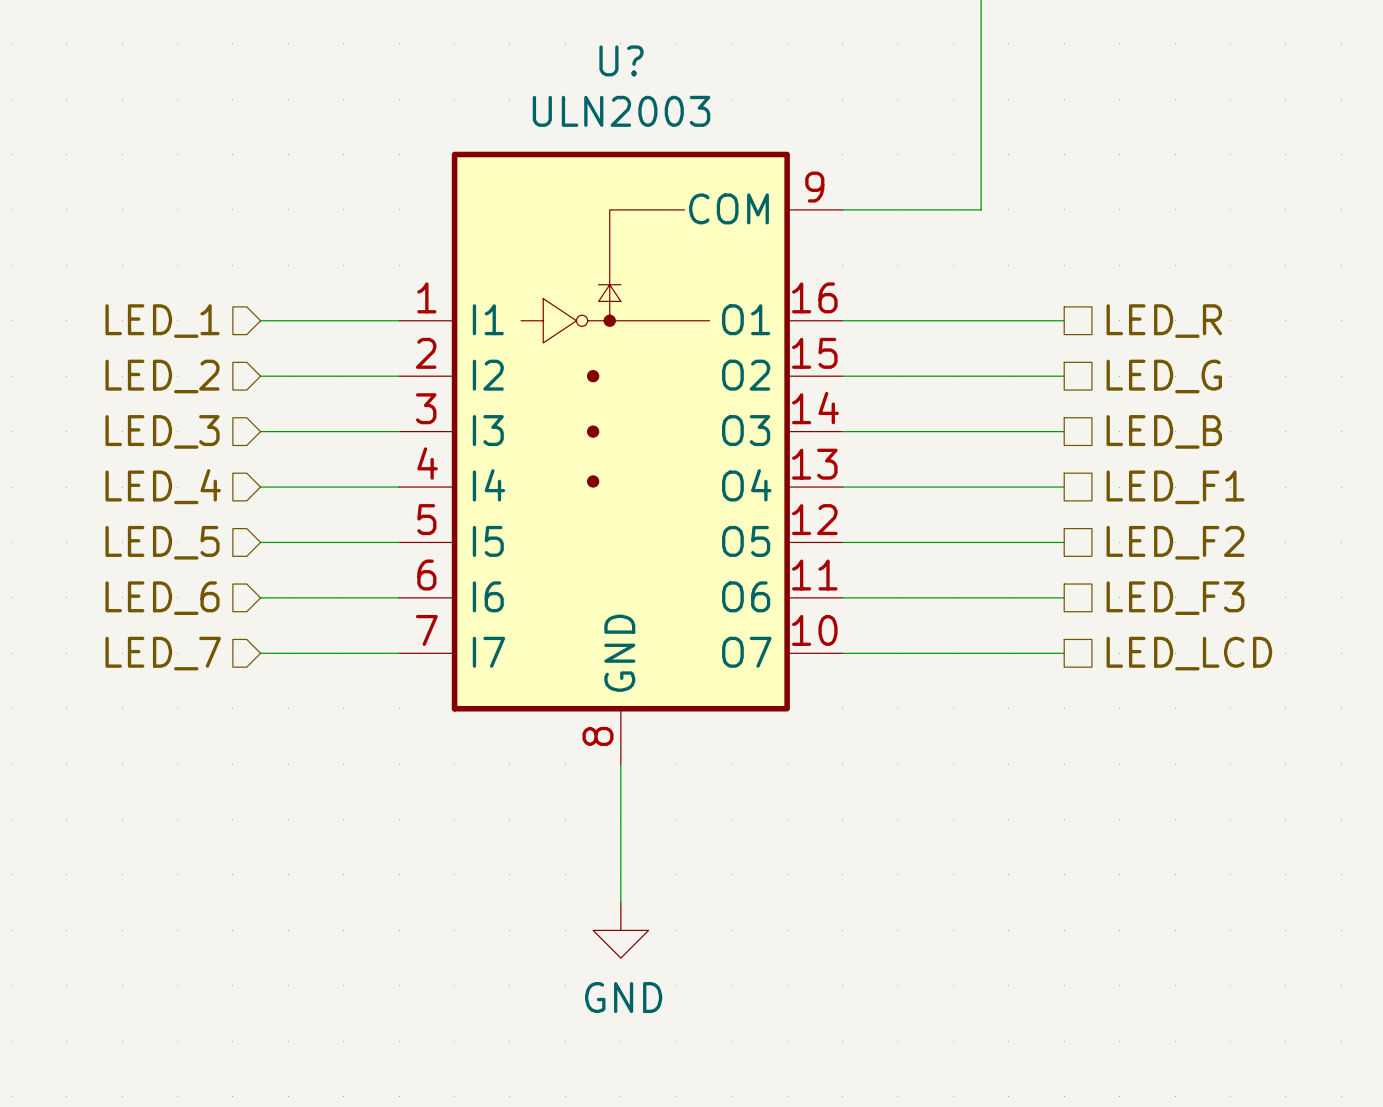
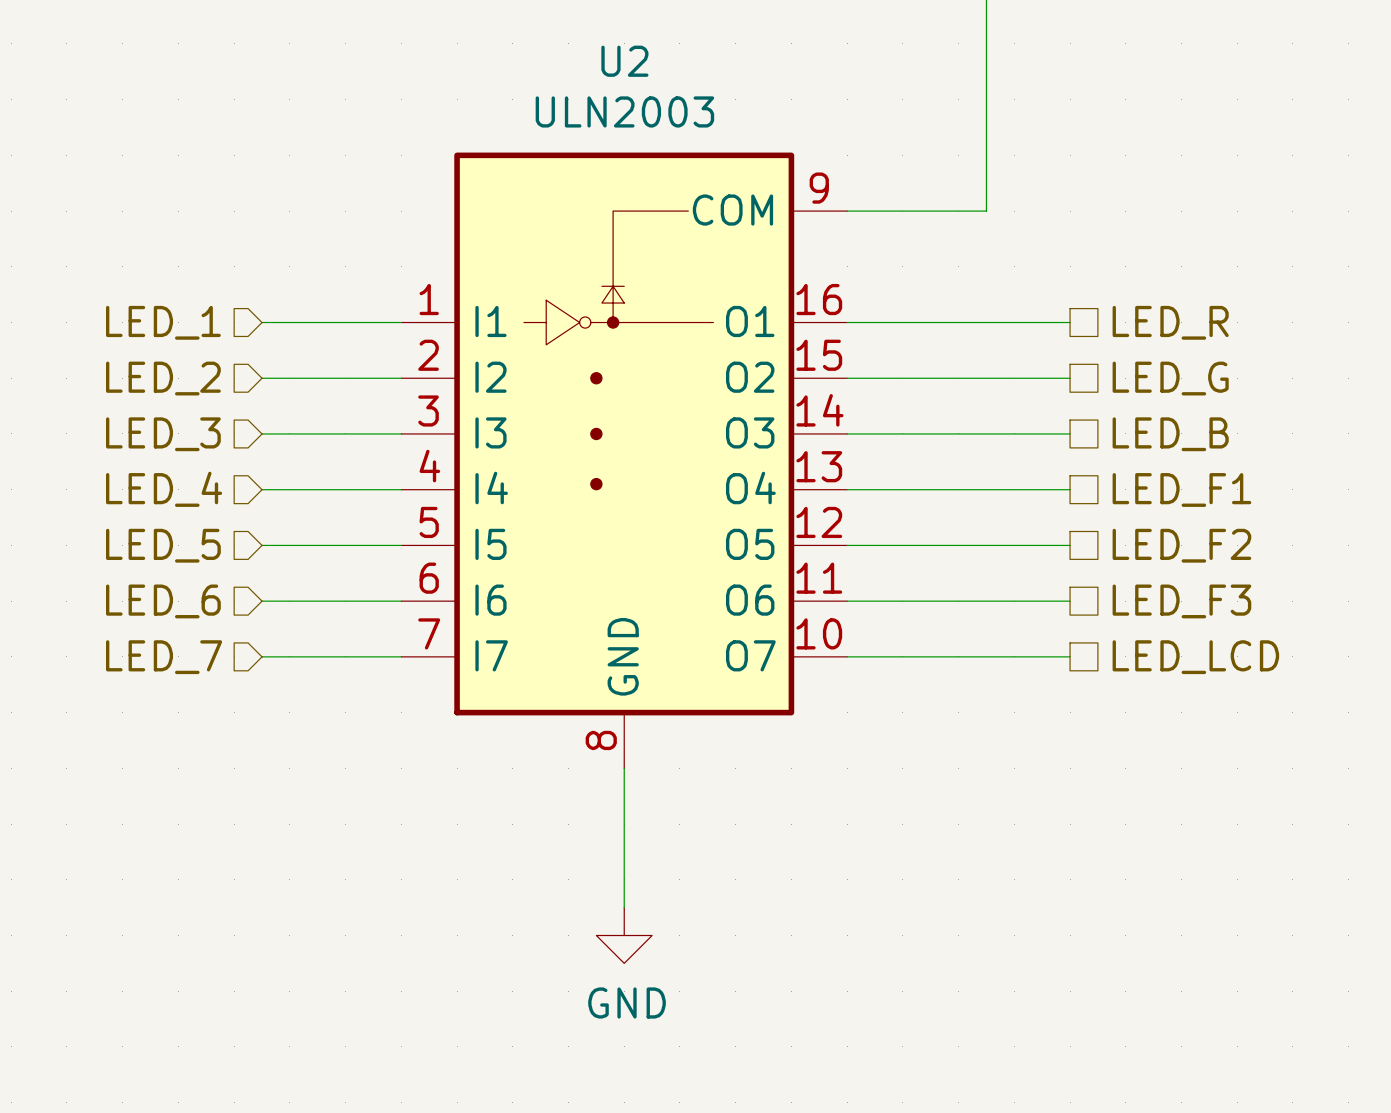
U? name: U? (621, 60) -> U2 (624, 61)

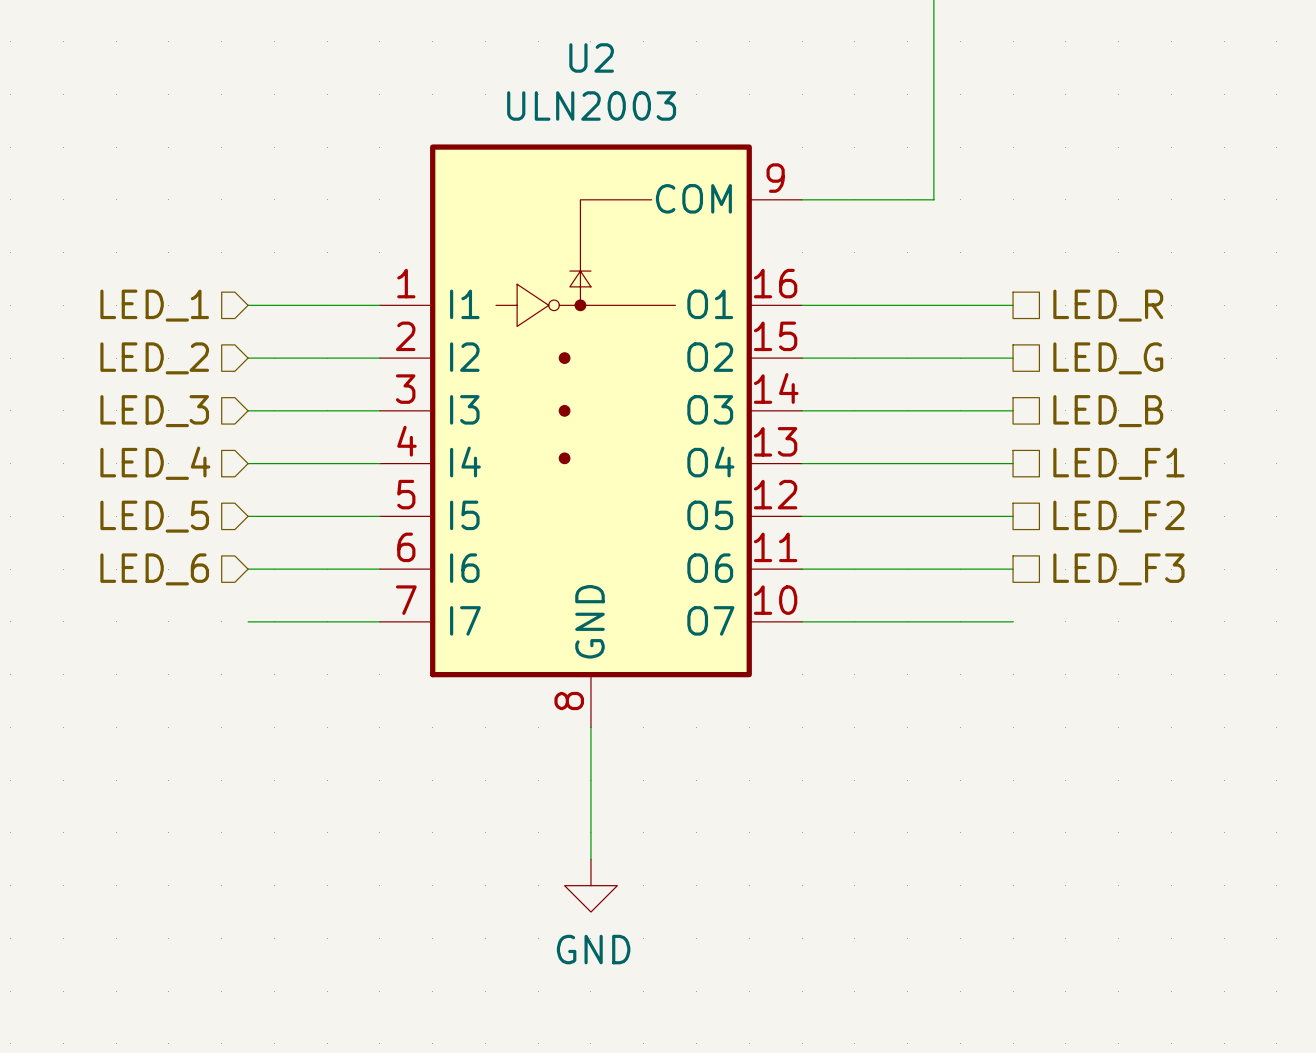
hierarchical label: LED_7 (164, 657) -> none
hierarchical label: LED_LCD (1195, 657) -> none

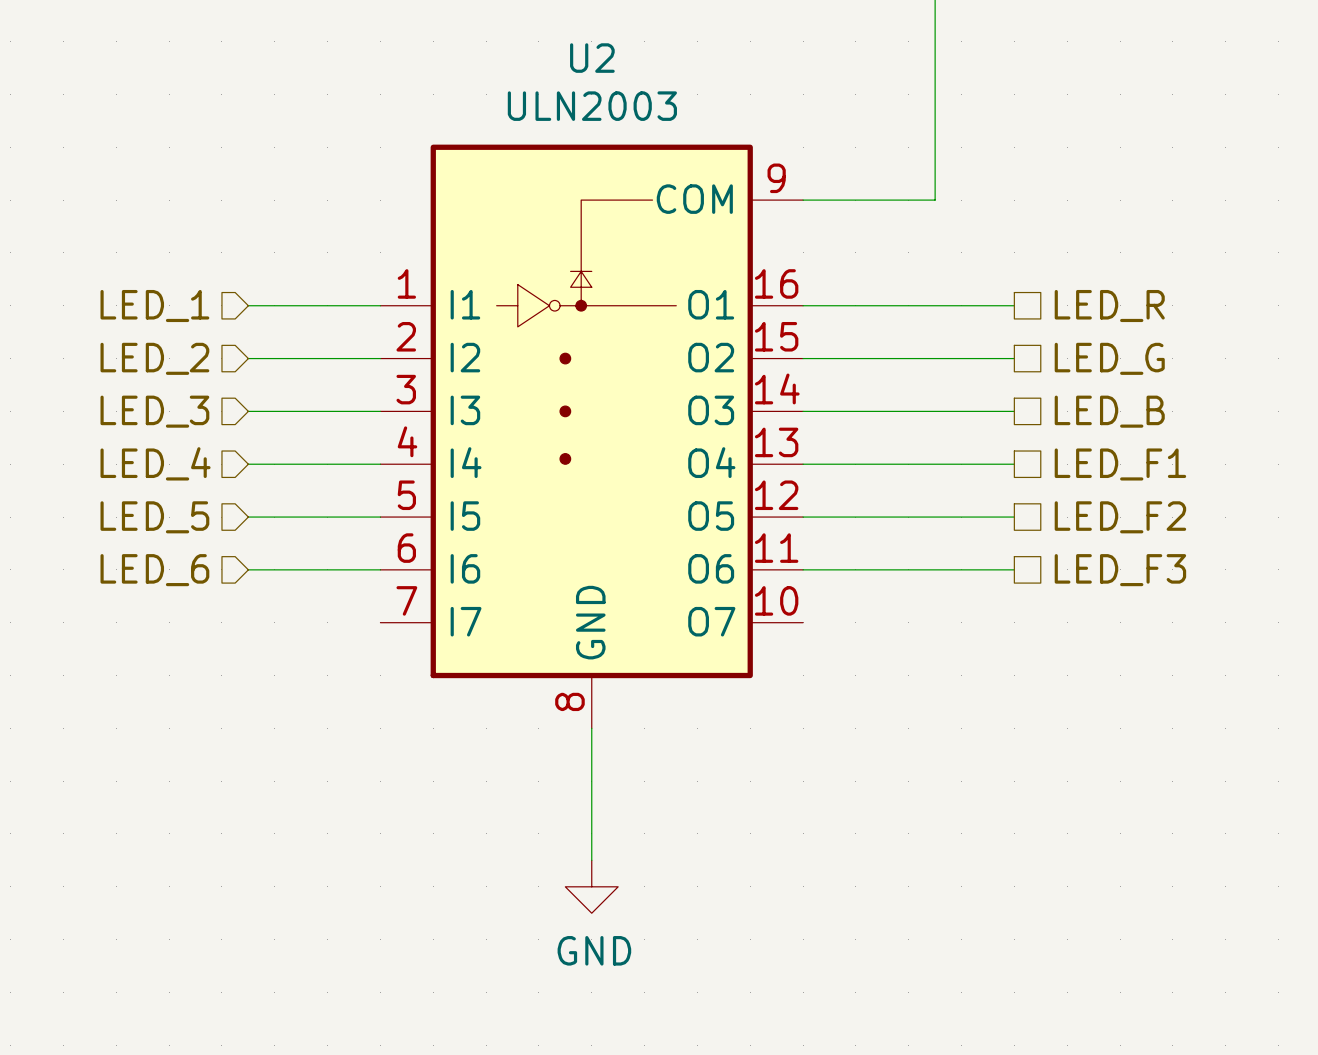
wire: (248, 621) (379, 621) -> none
wire: (802, 621) (1013, 621) -> none

